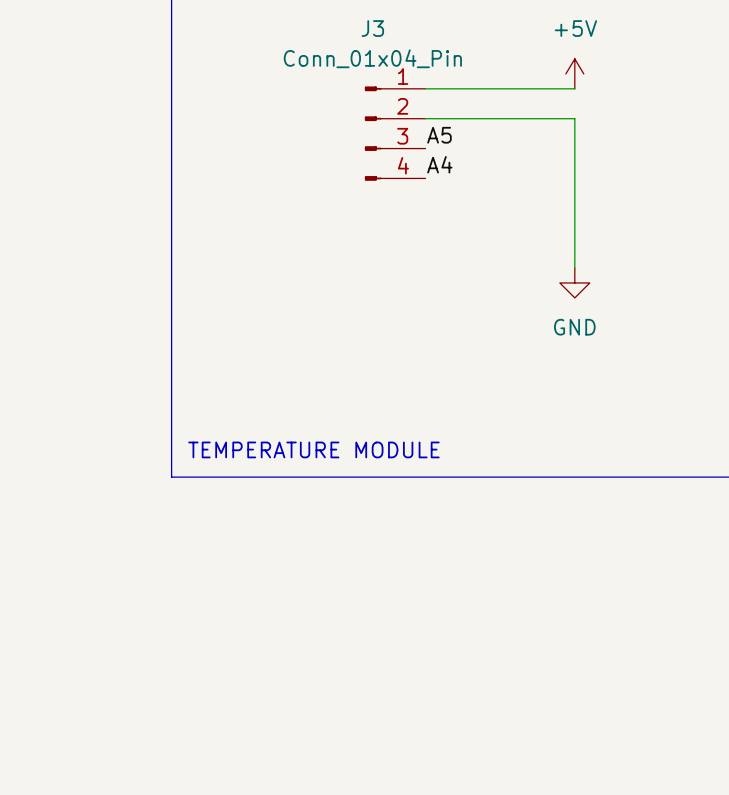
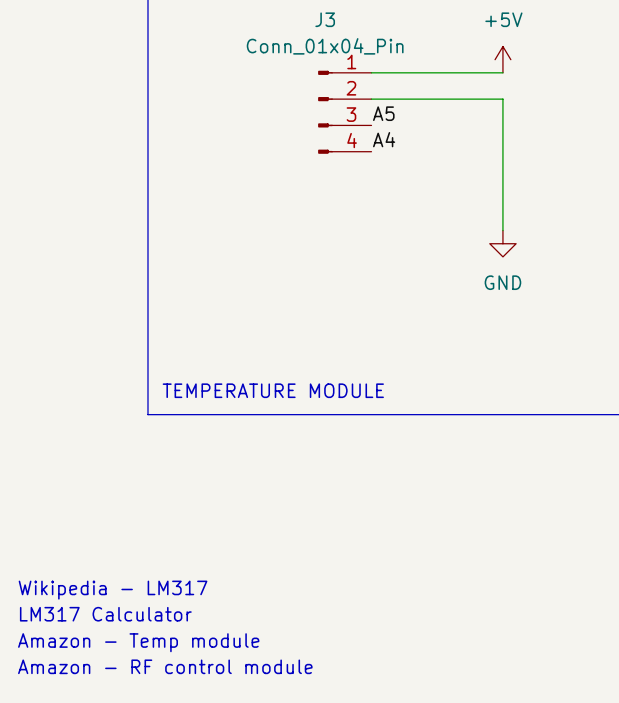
text: none -> Wikipedia - LM317 (113, 590)
text: none -> LM317 Calculator (105, 614)
text: none -> Amazon - Temp module (138, 642)
text: none -> Amazon - RF control module (165, 666)

